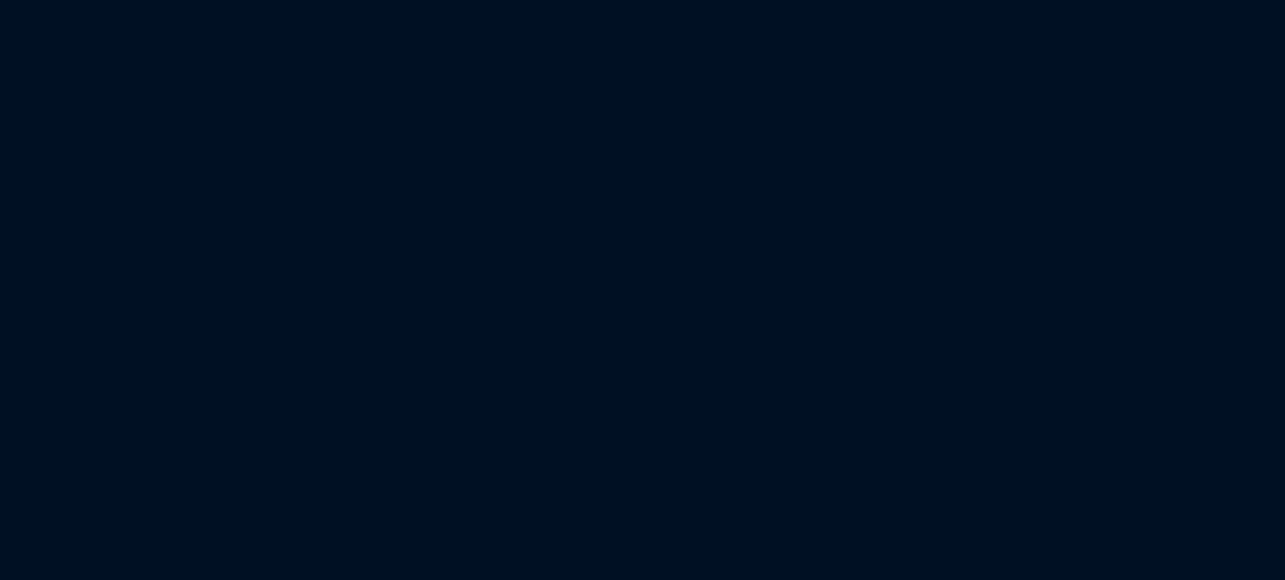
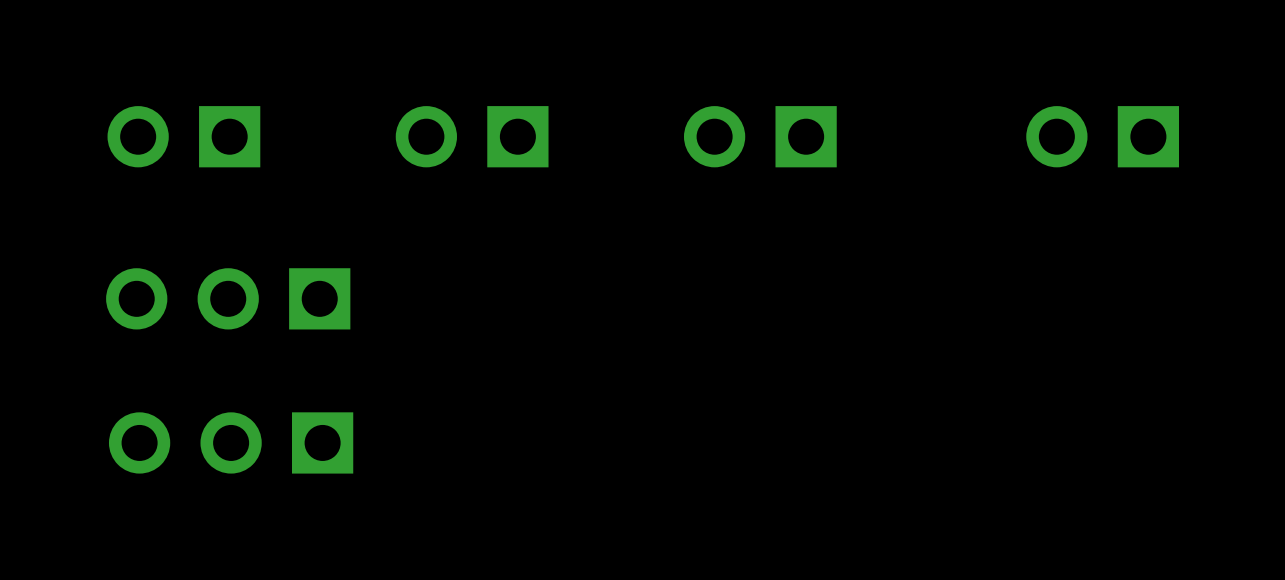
part: none -> (183, 136)
part: none -> (472, 136)
part: none -> (760, 136)
part: none -> (1102, 136)
part: none -> (228, 298)
part: none -> (231, 442)

